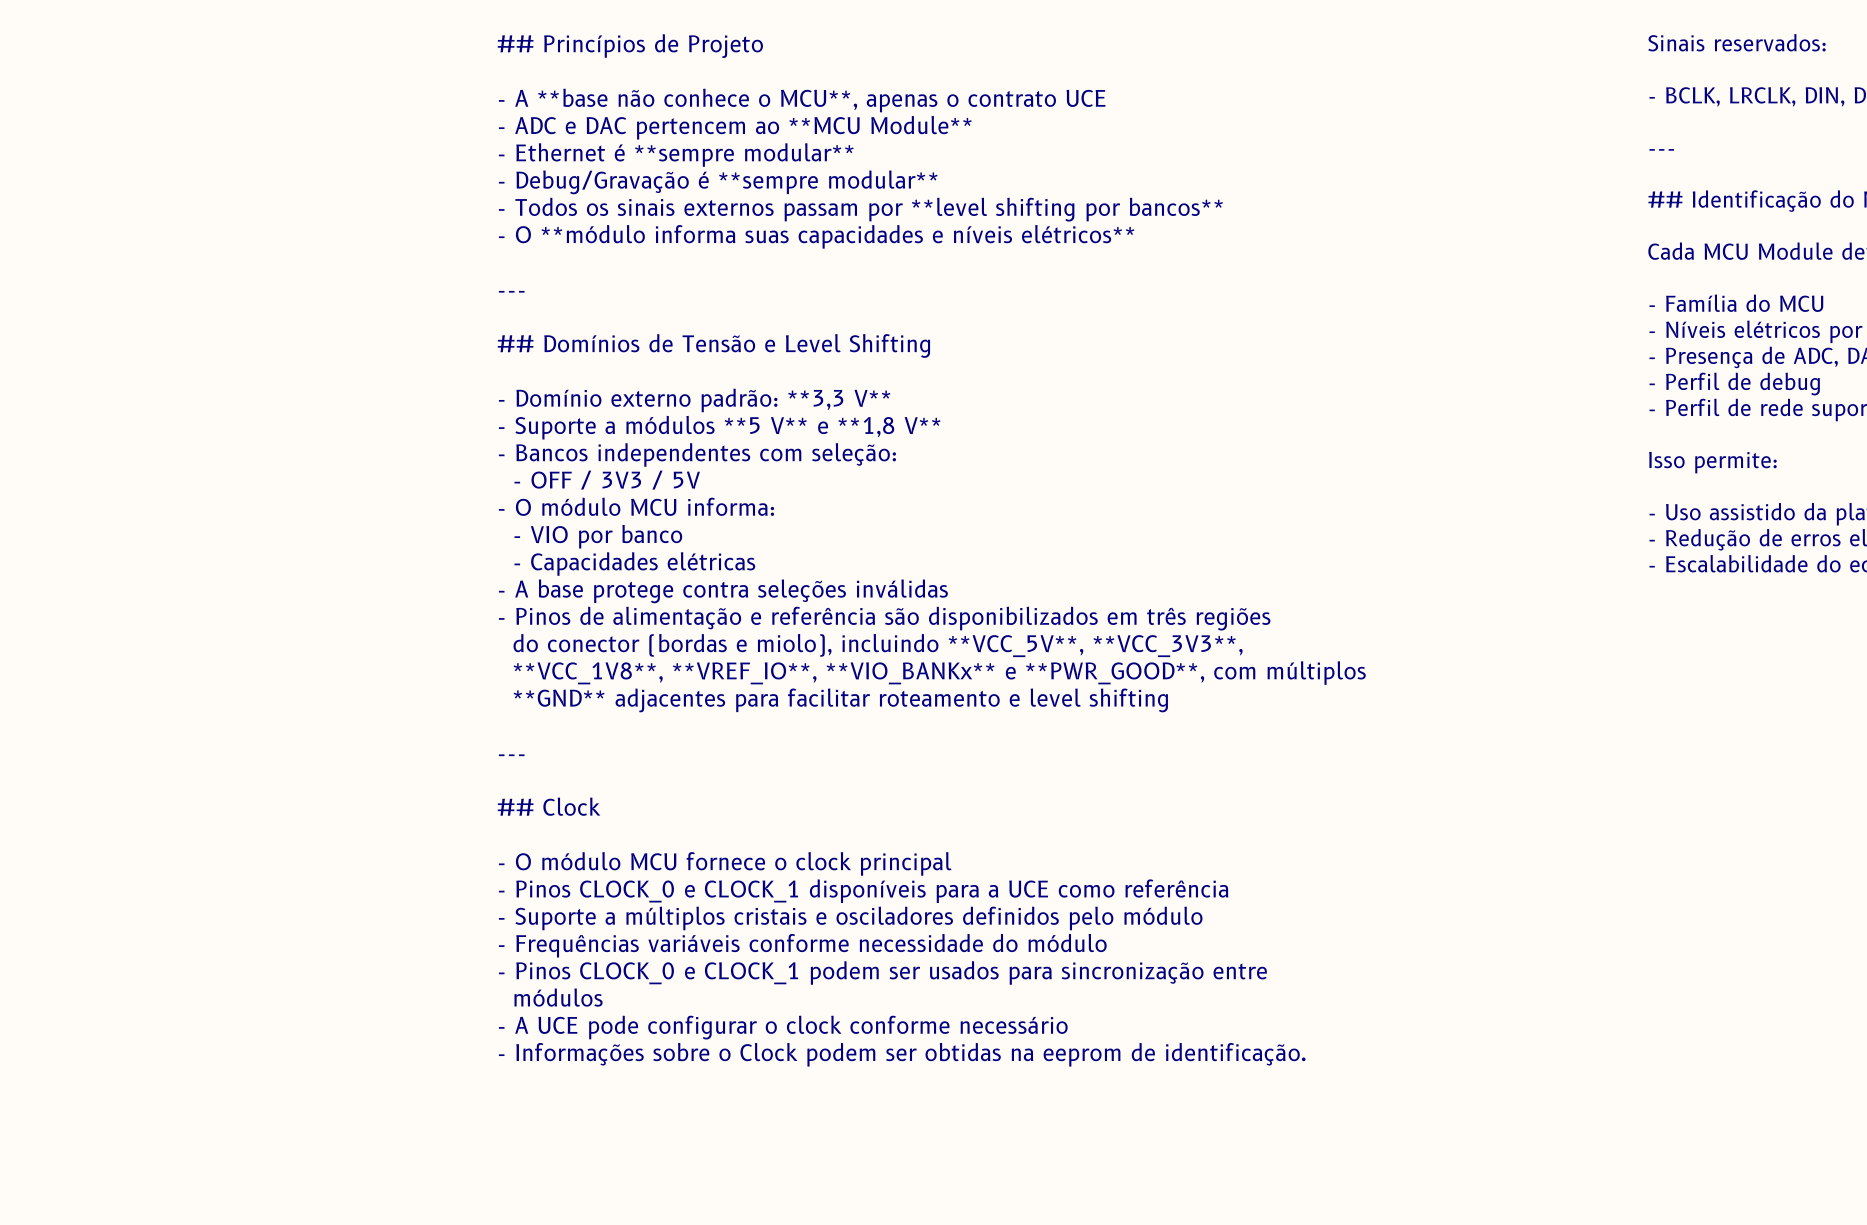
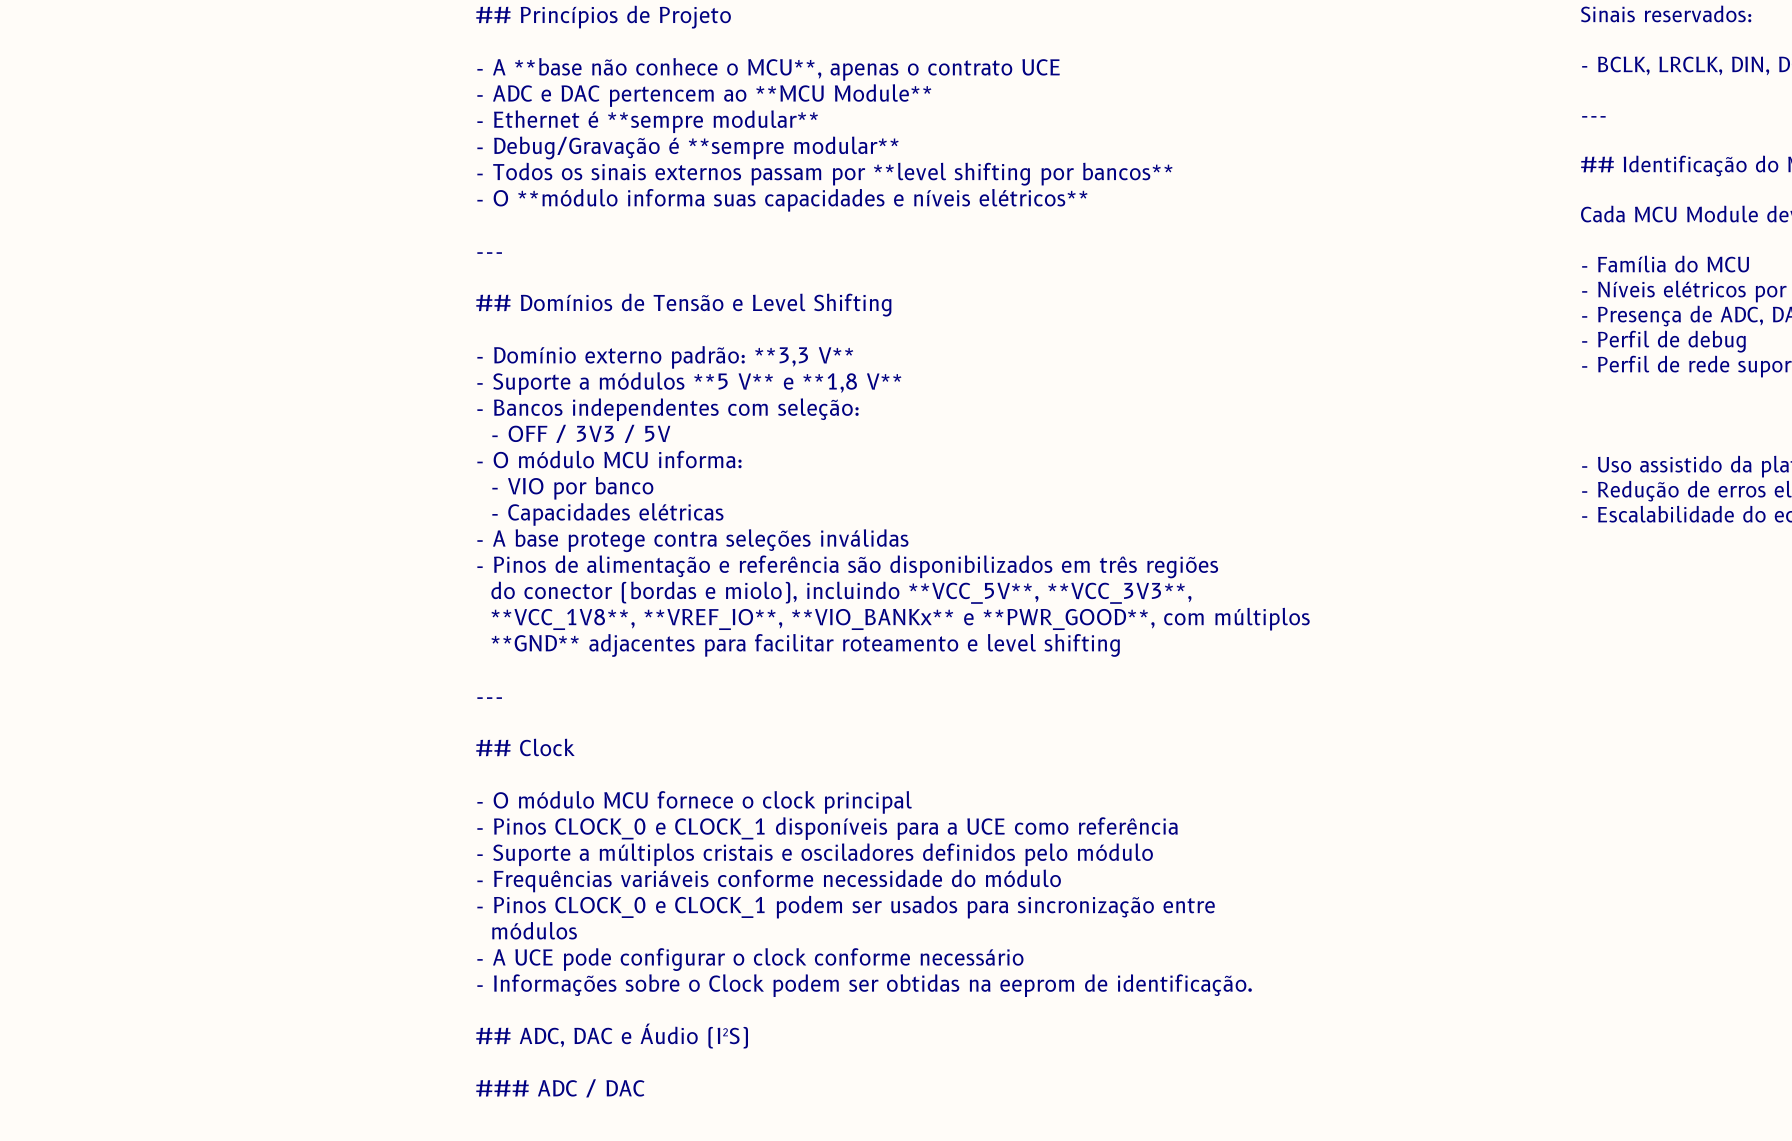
text: Isso permite: (1712, 462) -> none
text: none -> ## ADC, DAC e Áudio (I²S) (612, 1035)
text: none -> ### ADC / DAC (560, 1088)

